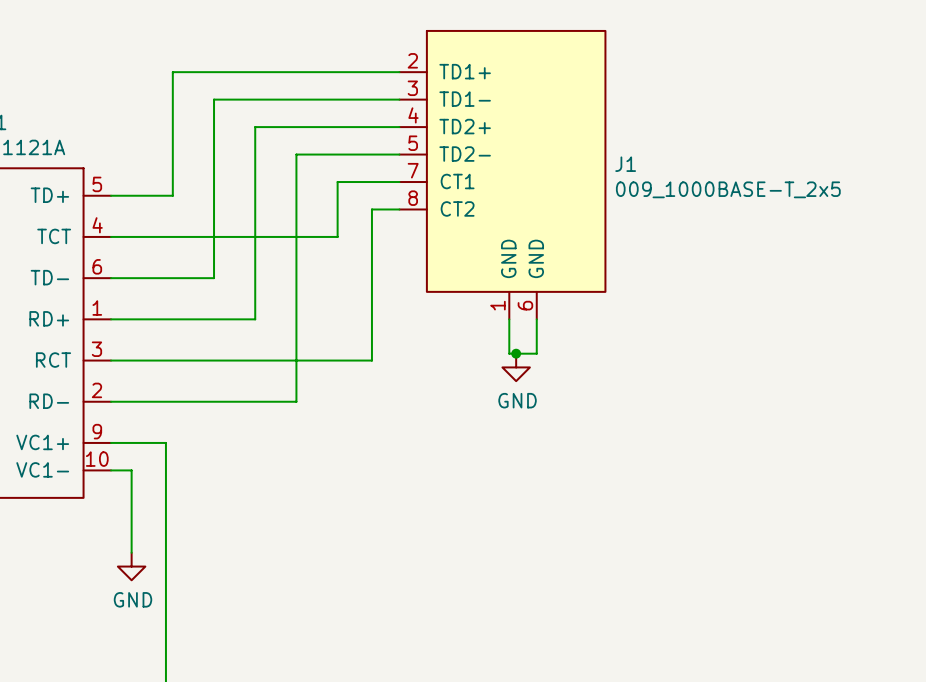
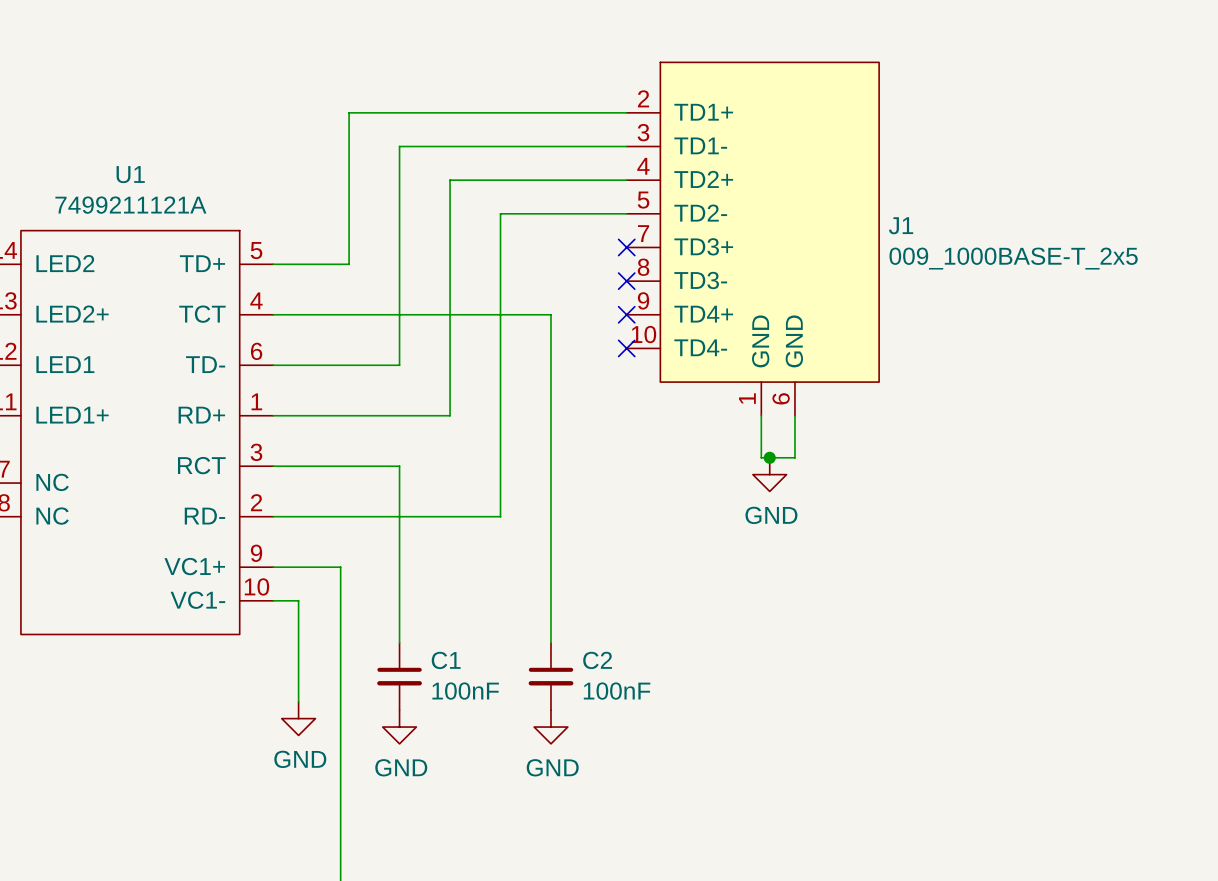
J1 symbol: [399, 30, 606, 320] -> [626, 62, 880, 416]
wire: (399, 182) (337, 182) (337, 236) -> (550, 642) (550, 314)
no-connect mark: none -> (626, 247)
wire: (399, 209) (371, 209) (371, 360) (214, 360) -> (399, 642) (399, 466)
no-connect mark: none -> (626, 281)
no-connect mark: none -> (626, 314)
no-connect mark: none -> (626, 348)
C1: none -> 100nF (399, 676)
C2: none -> 100nF (550, 676)
power symbol: none -> GND (399, 727)
power symbol: none -> GND (550, 727)

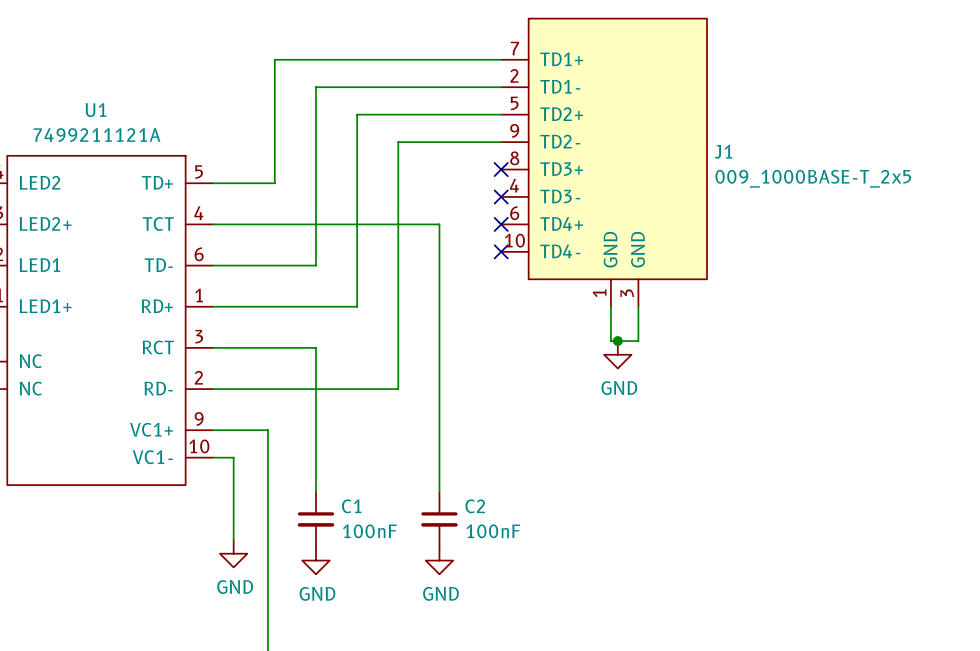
J1 pin number: 2 (643, 98) -> 7 (514, 48)
J1 pin number: 3 (643, 132) -> 2 (514, 75)
J1 pin number: 4 (643, 166) -> 5 (514, 103)
J1 pin number: 5 (643, 200) -> 9 (514, 130)
J1 pin number: 7 (643, 233) -> 8 (514, 158)
J1 pin number: 8 (643, 267) -> 4 (514, 185)
J1 pin number: 9 (643, 300) -> 6 (514, 213)
J1 pin number: 6 (781, 398) -> 3 (627, 293)

